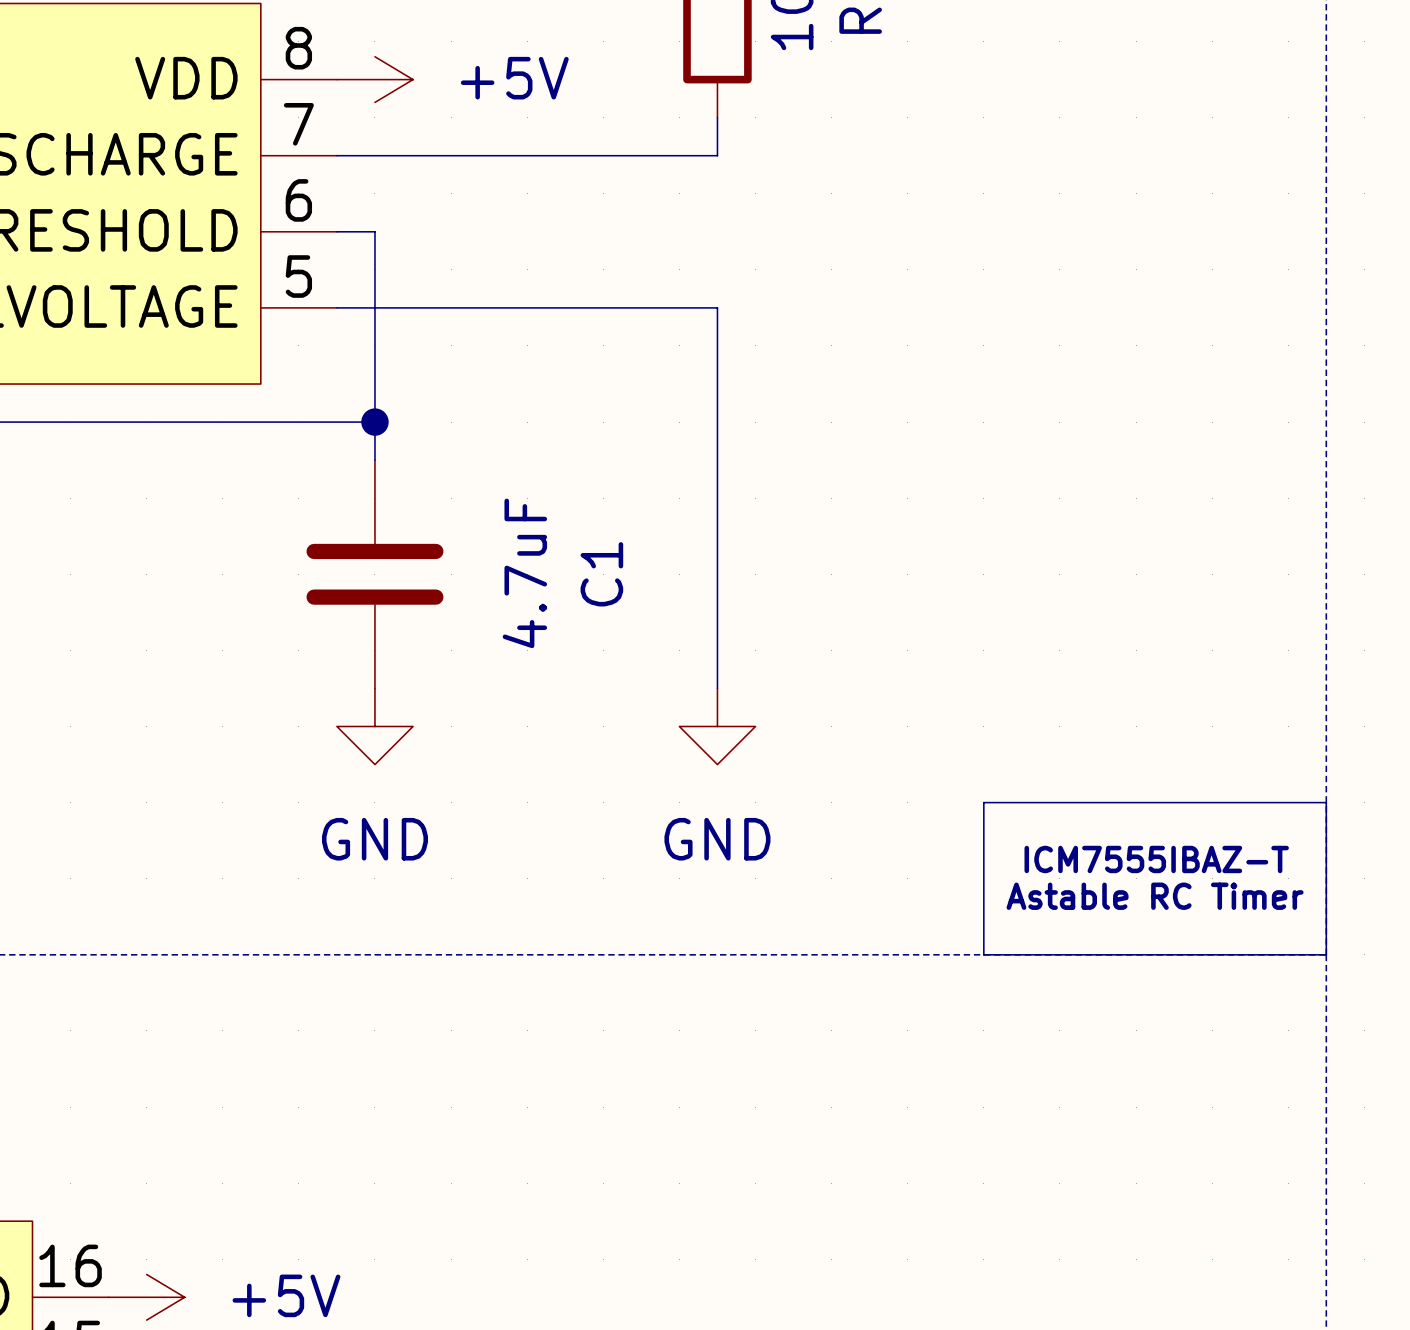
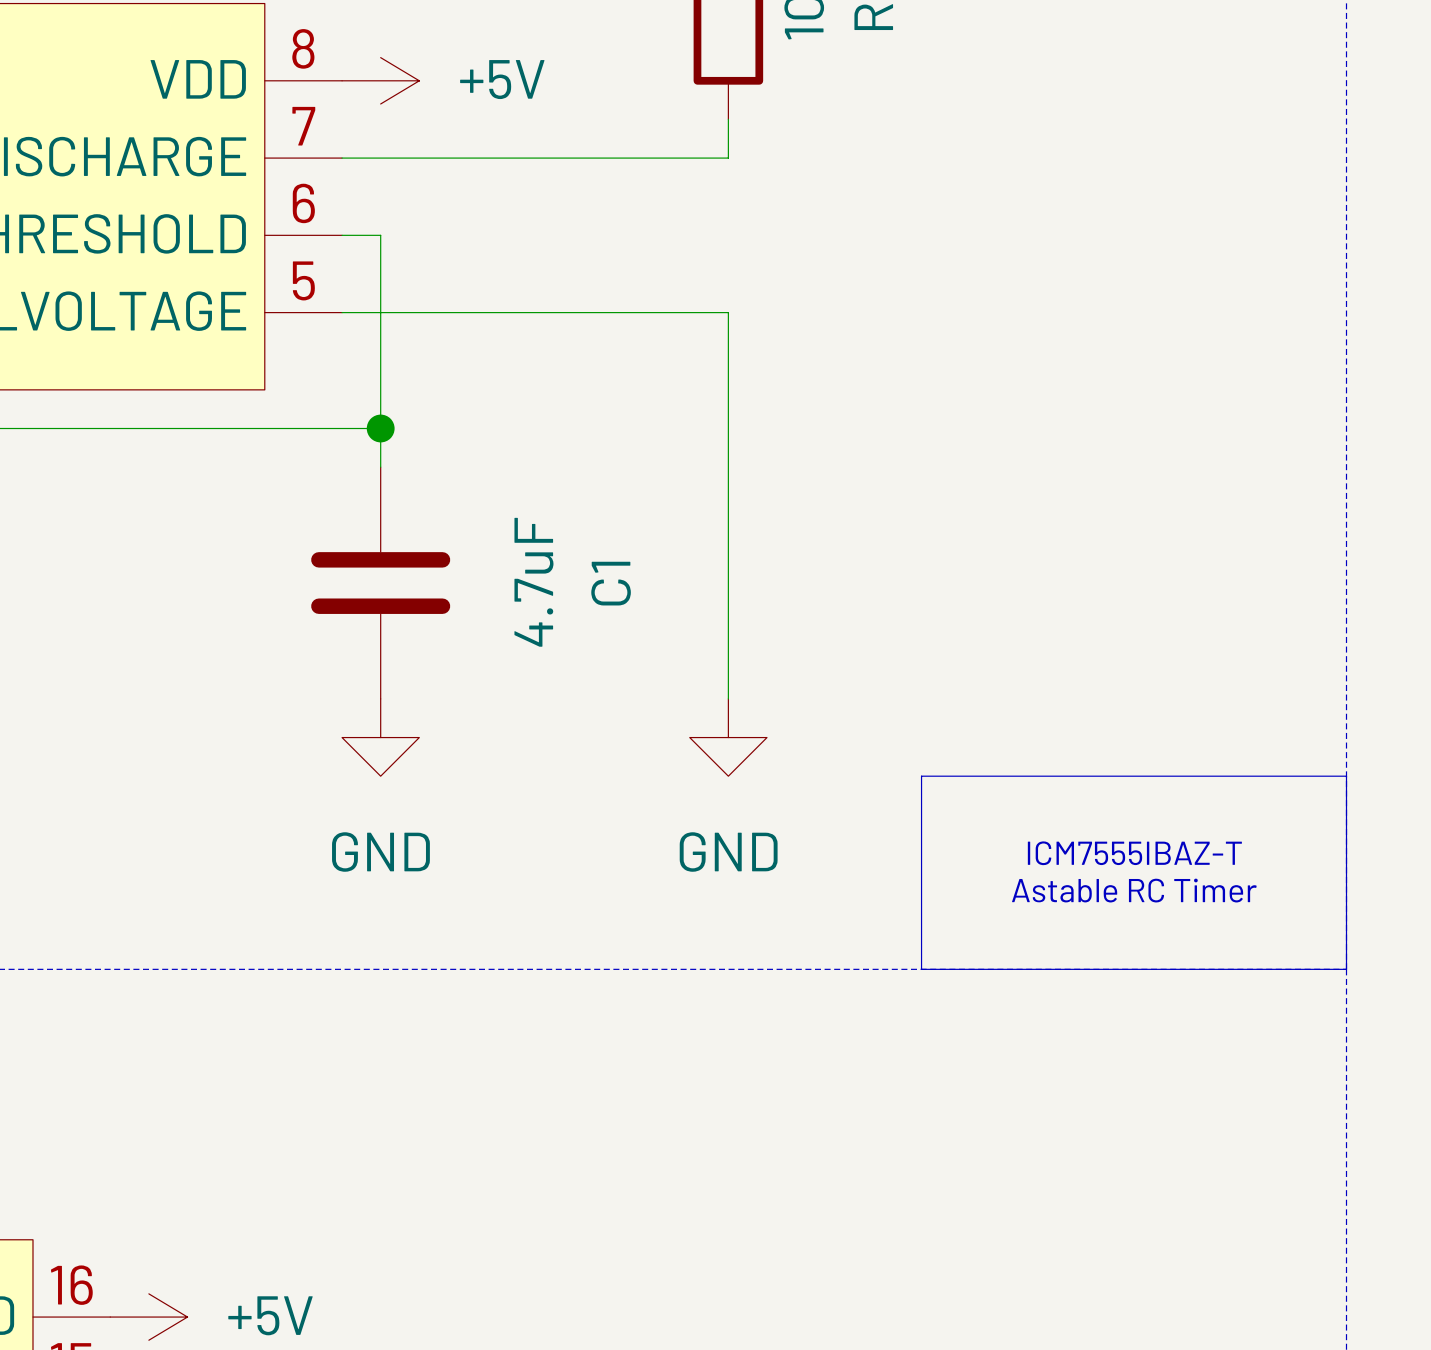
line: (1326, 802) (983, 802) (983, 954) -> (1346, 814) (1346, 776) (921, 776) (921, 969) (998, 969)
text position: ICM7555IBAZ-T (1156, 859) -> ICM7555IBAZ-T (1134, 853)
text position: Astable RC Timer (1155, 896) -> Astable RC Timer (1134, 890)

